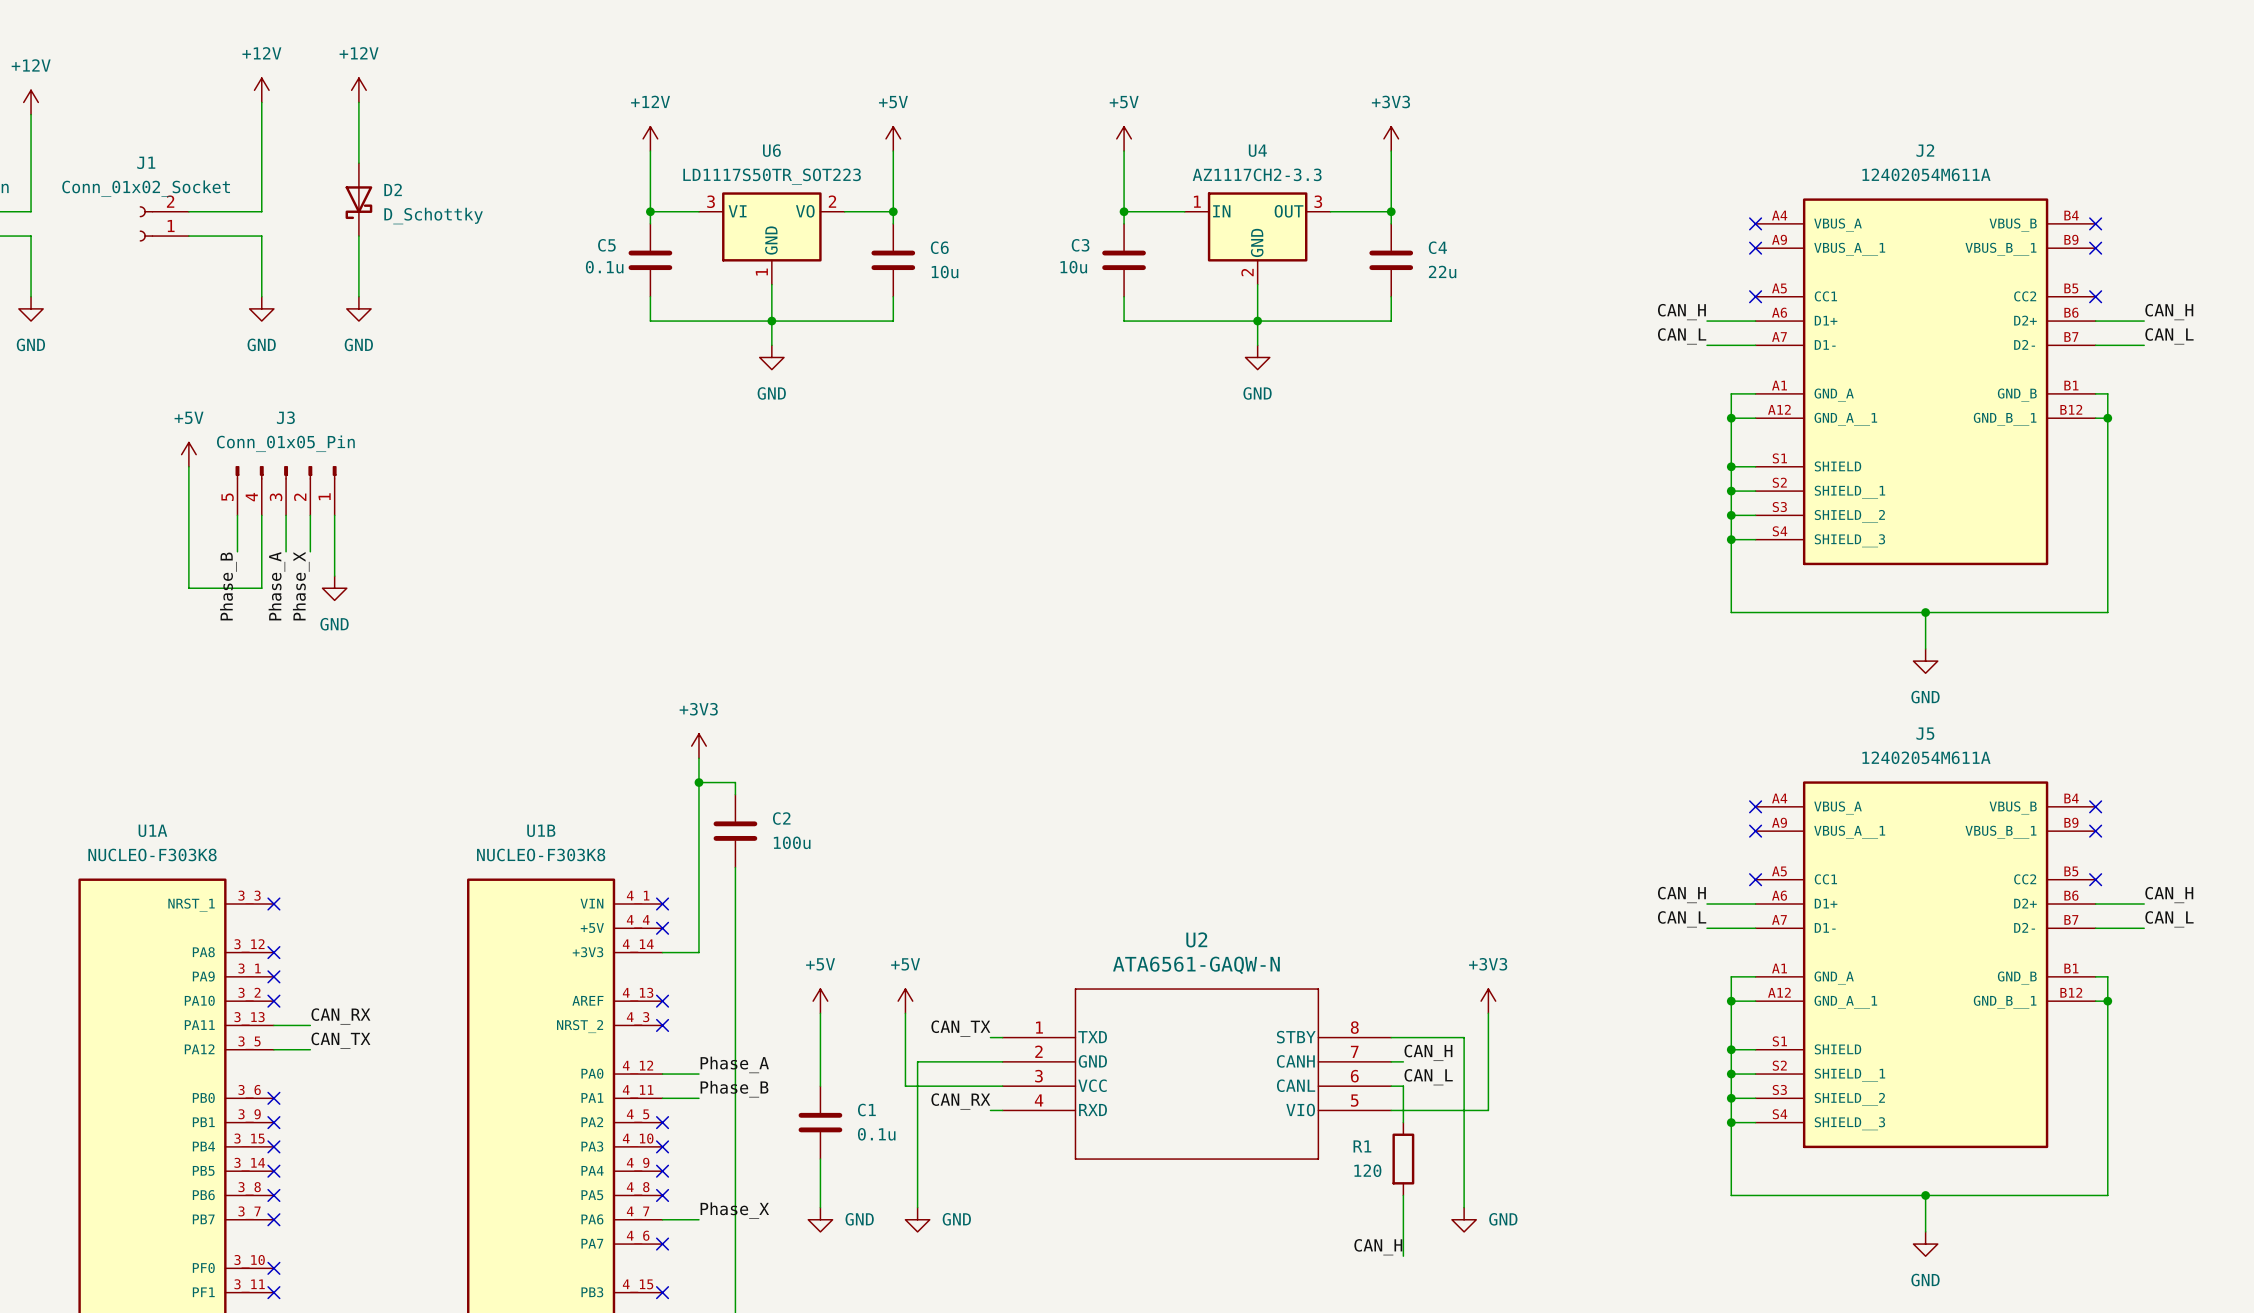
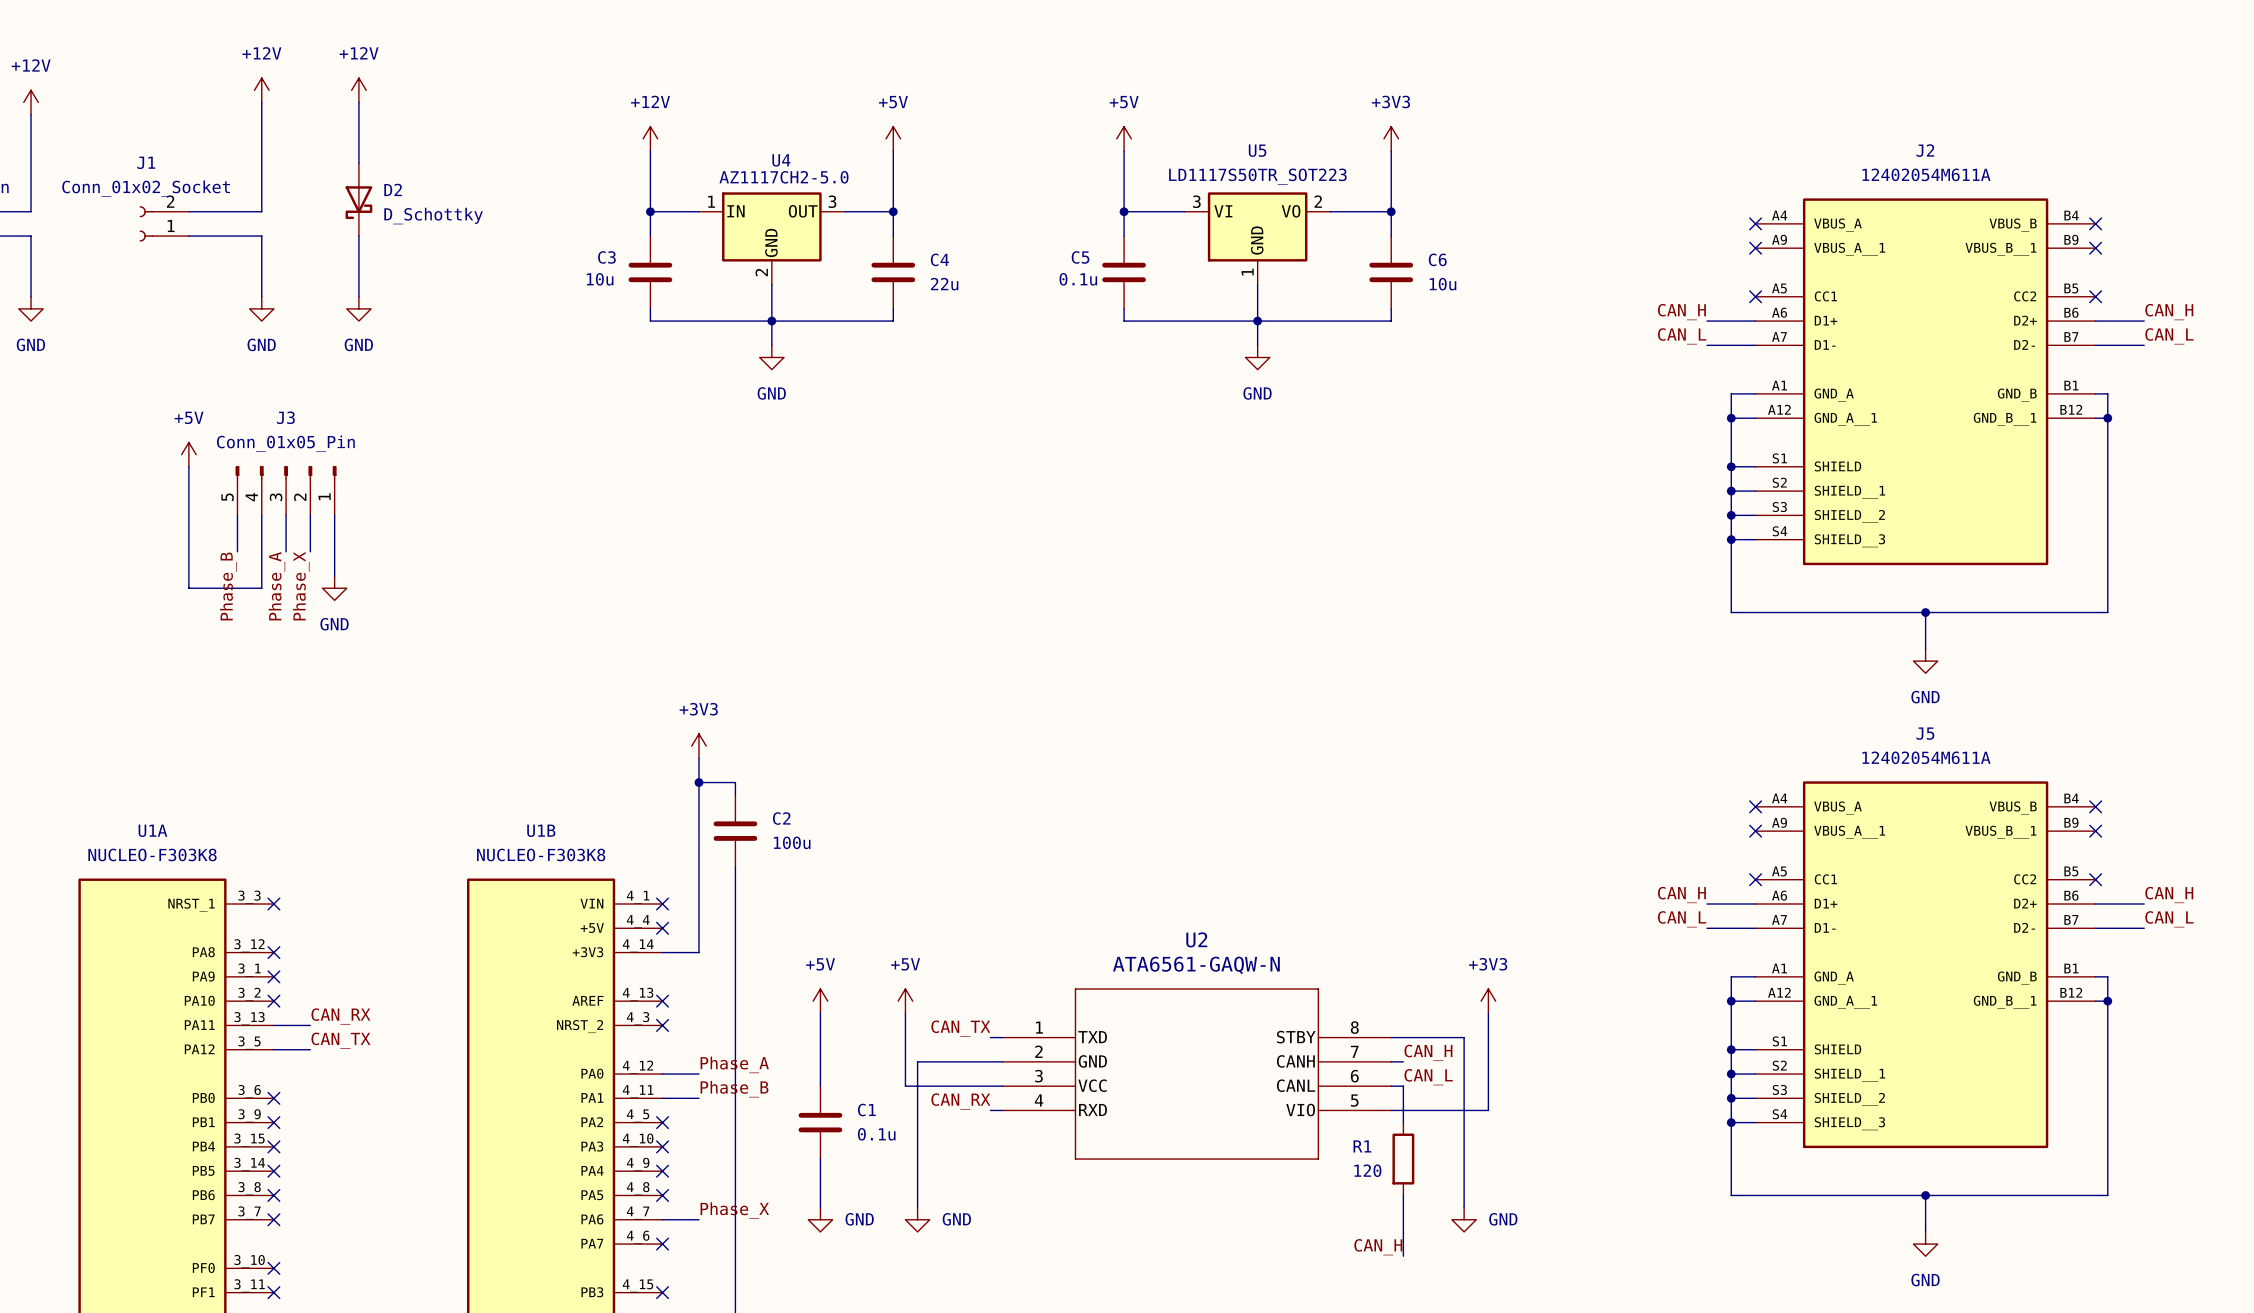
U4 name position: U4 (1257, 150) -> U4 (781, 160)
U4 value: AZ1117CH2-3.3 (1257, 174) -> AZ1117CH2-5.0 (784, 177)
U6: LD1117S50TR_SOT223 (771, 238) -> none
U4 position: (1257, 238) -> (771, 238)
U5: none -> LD1117S50TR_SOT223 (1257, 238)
C5 position: (650, 260) -> (1124, 272)
C6 position: (893, 260) -> (1391, 272)
C3 position: (1124, 260) -> (650, 272)
C4 position: (1391, 260) -> (893, 272)

